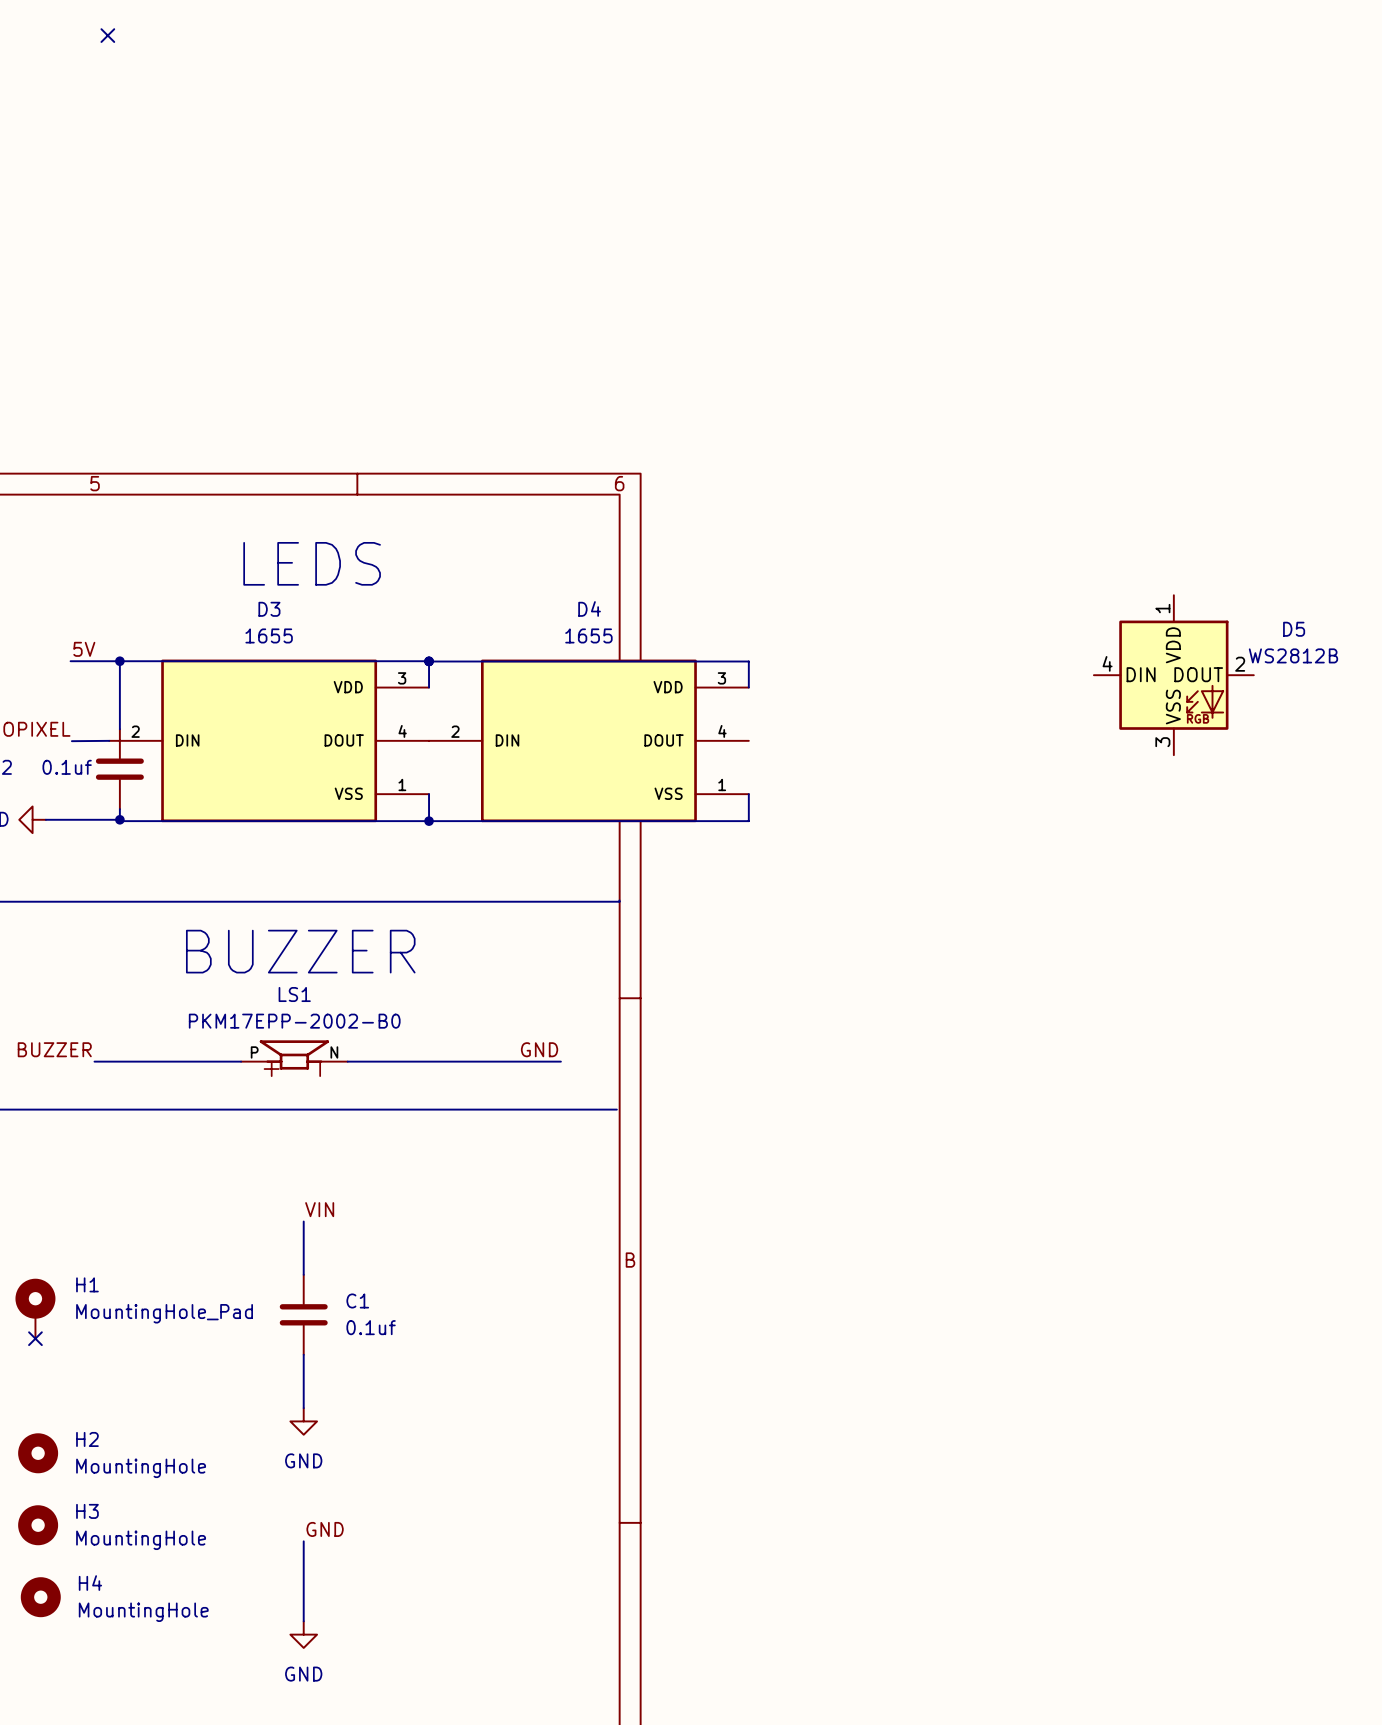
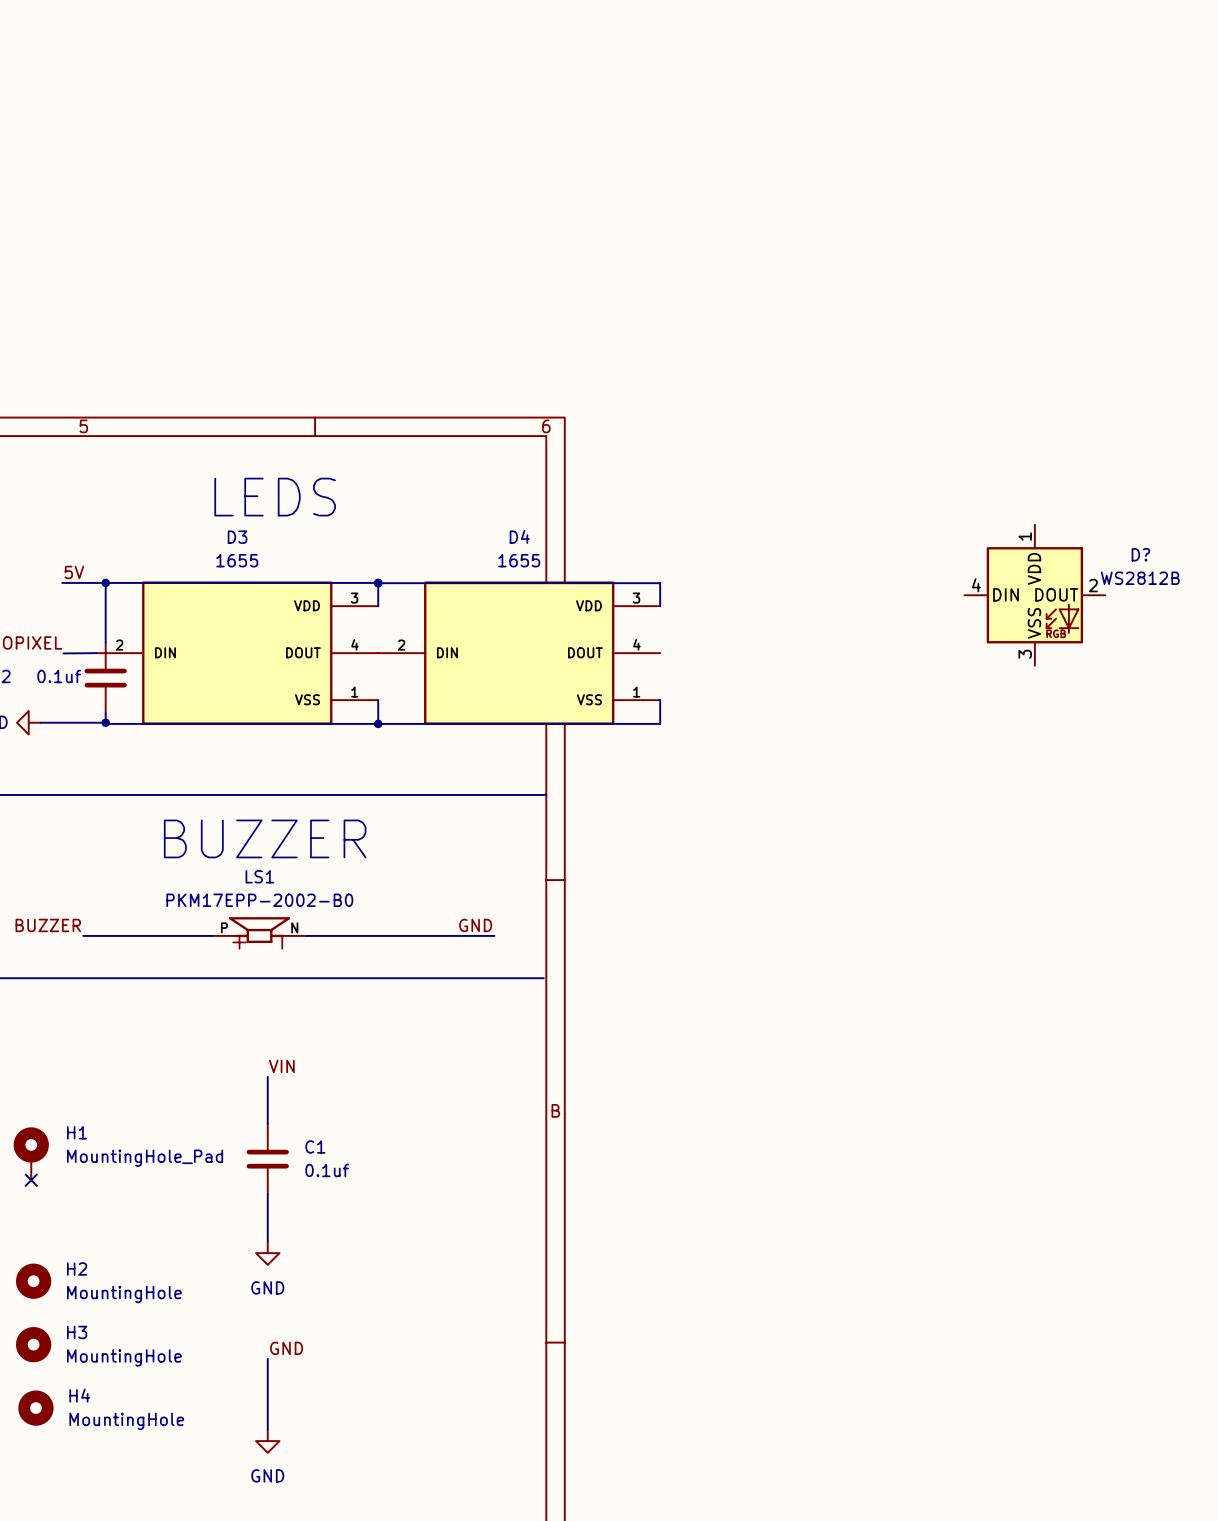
no-connect mark: (107, 35) -> none
D5 name: D5 (1294, 629) -> D? (1140, 554)

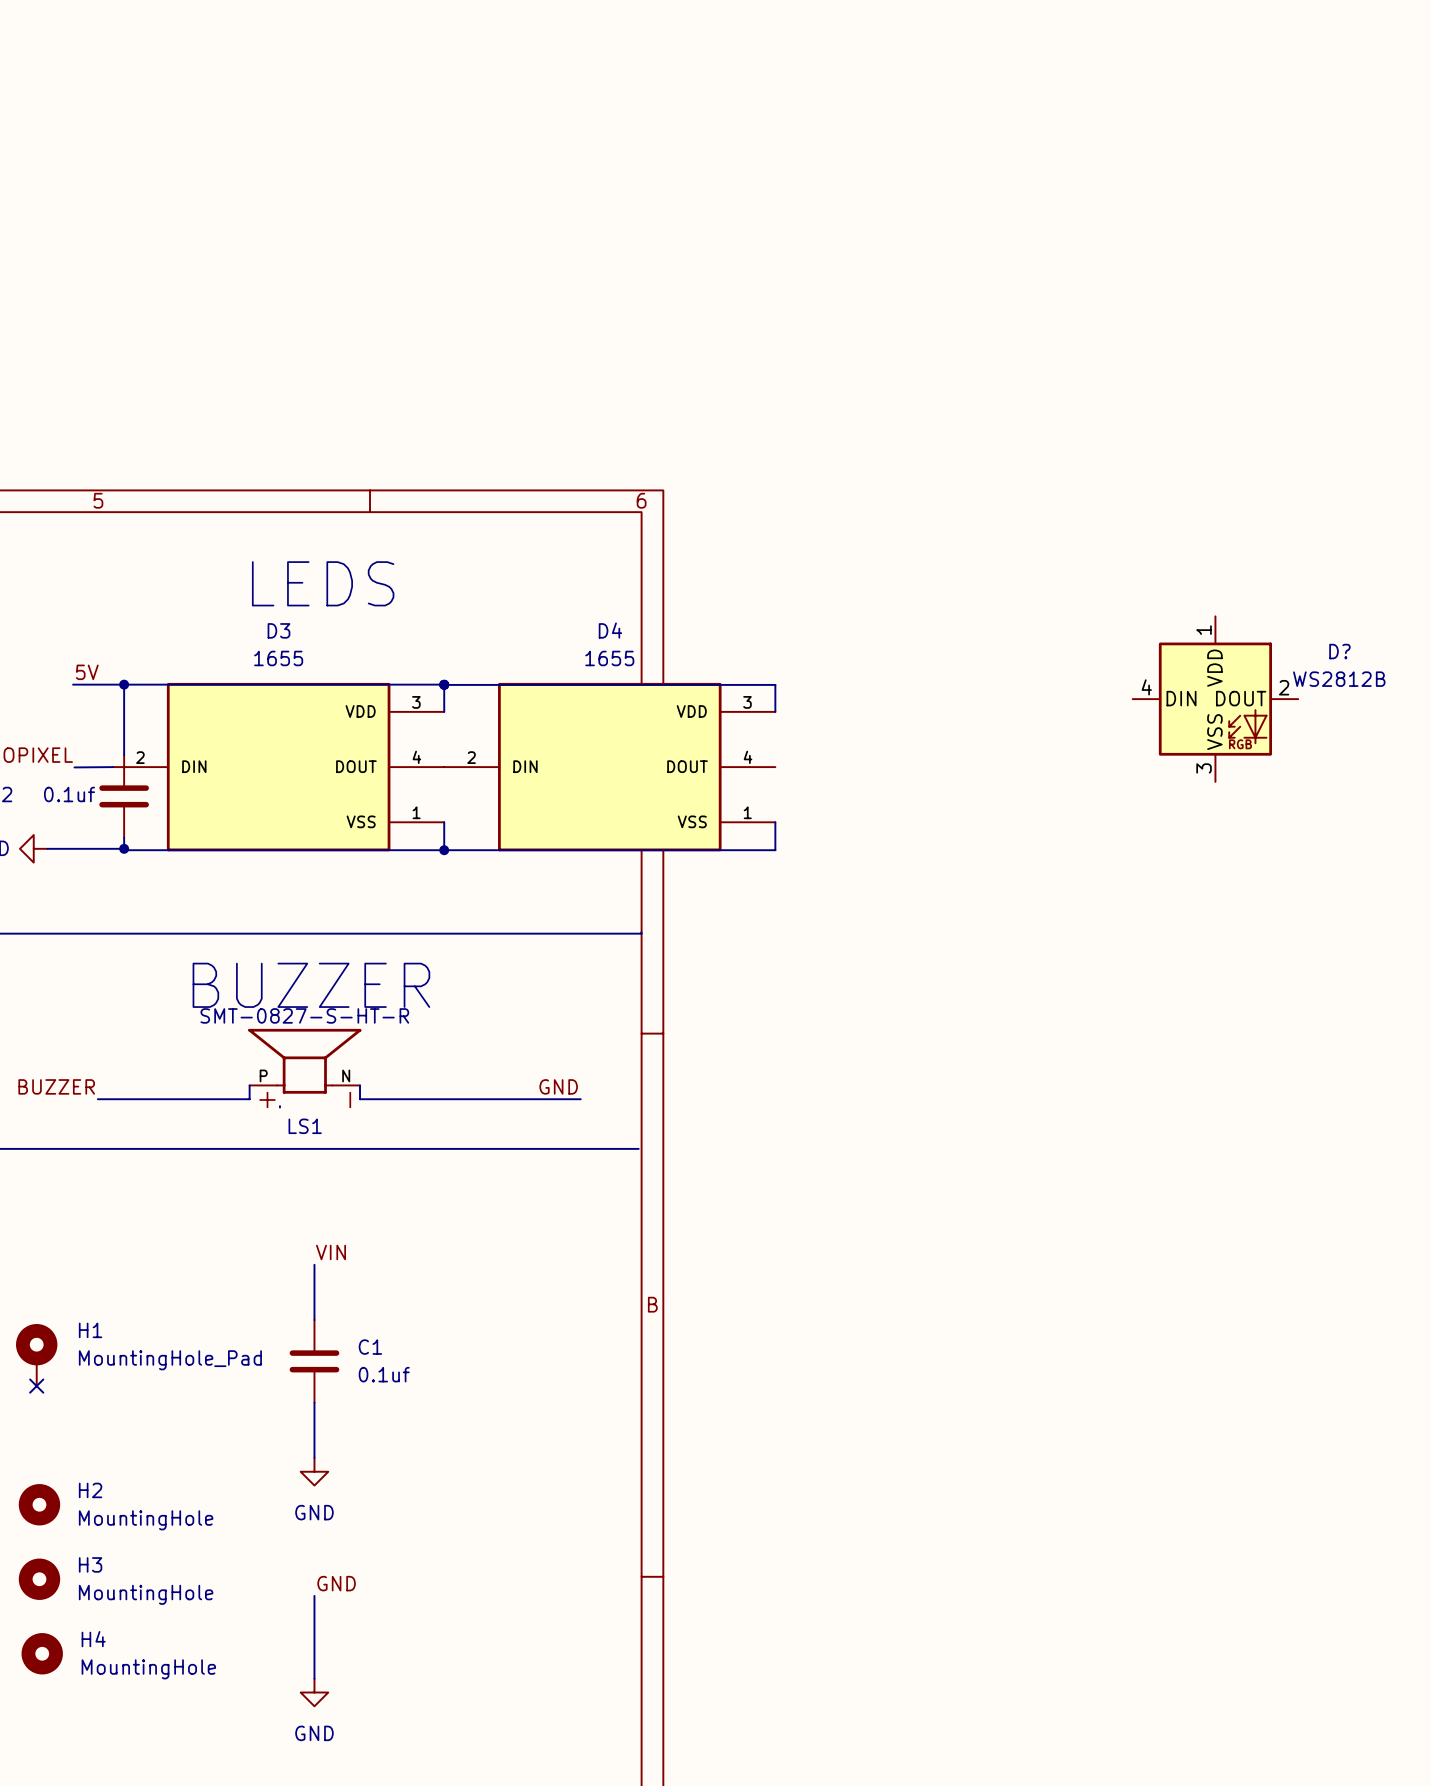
LS1 name position: LS1 (259, 876) -> LS1 (305, 1126)
LS1 value: PKM17EPP-2002-B0 (259, 900) -> SMT-0827-S-HT-R (304, 1015)
LS1 symbol: [212, 917, 307, 943] -> [248, 1028, 362, 1094]
wire: none -> (249, 1085) (249, 1099)
wire: none -> (360, 1085) (360, 1099)

